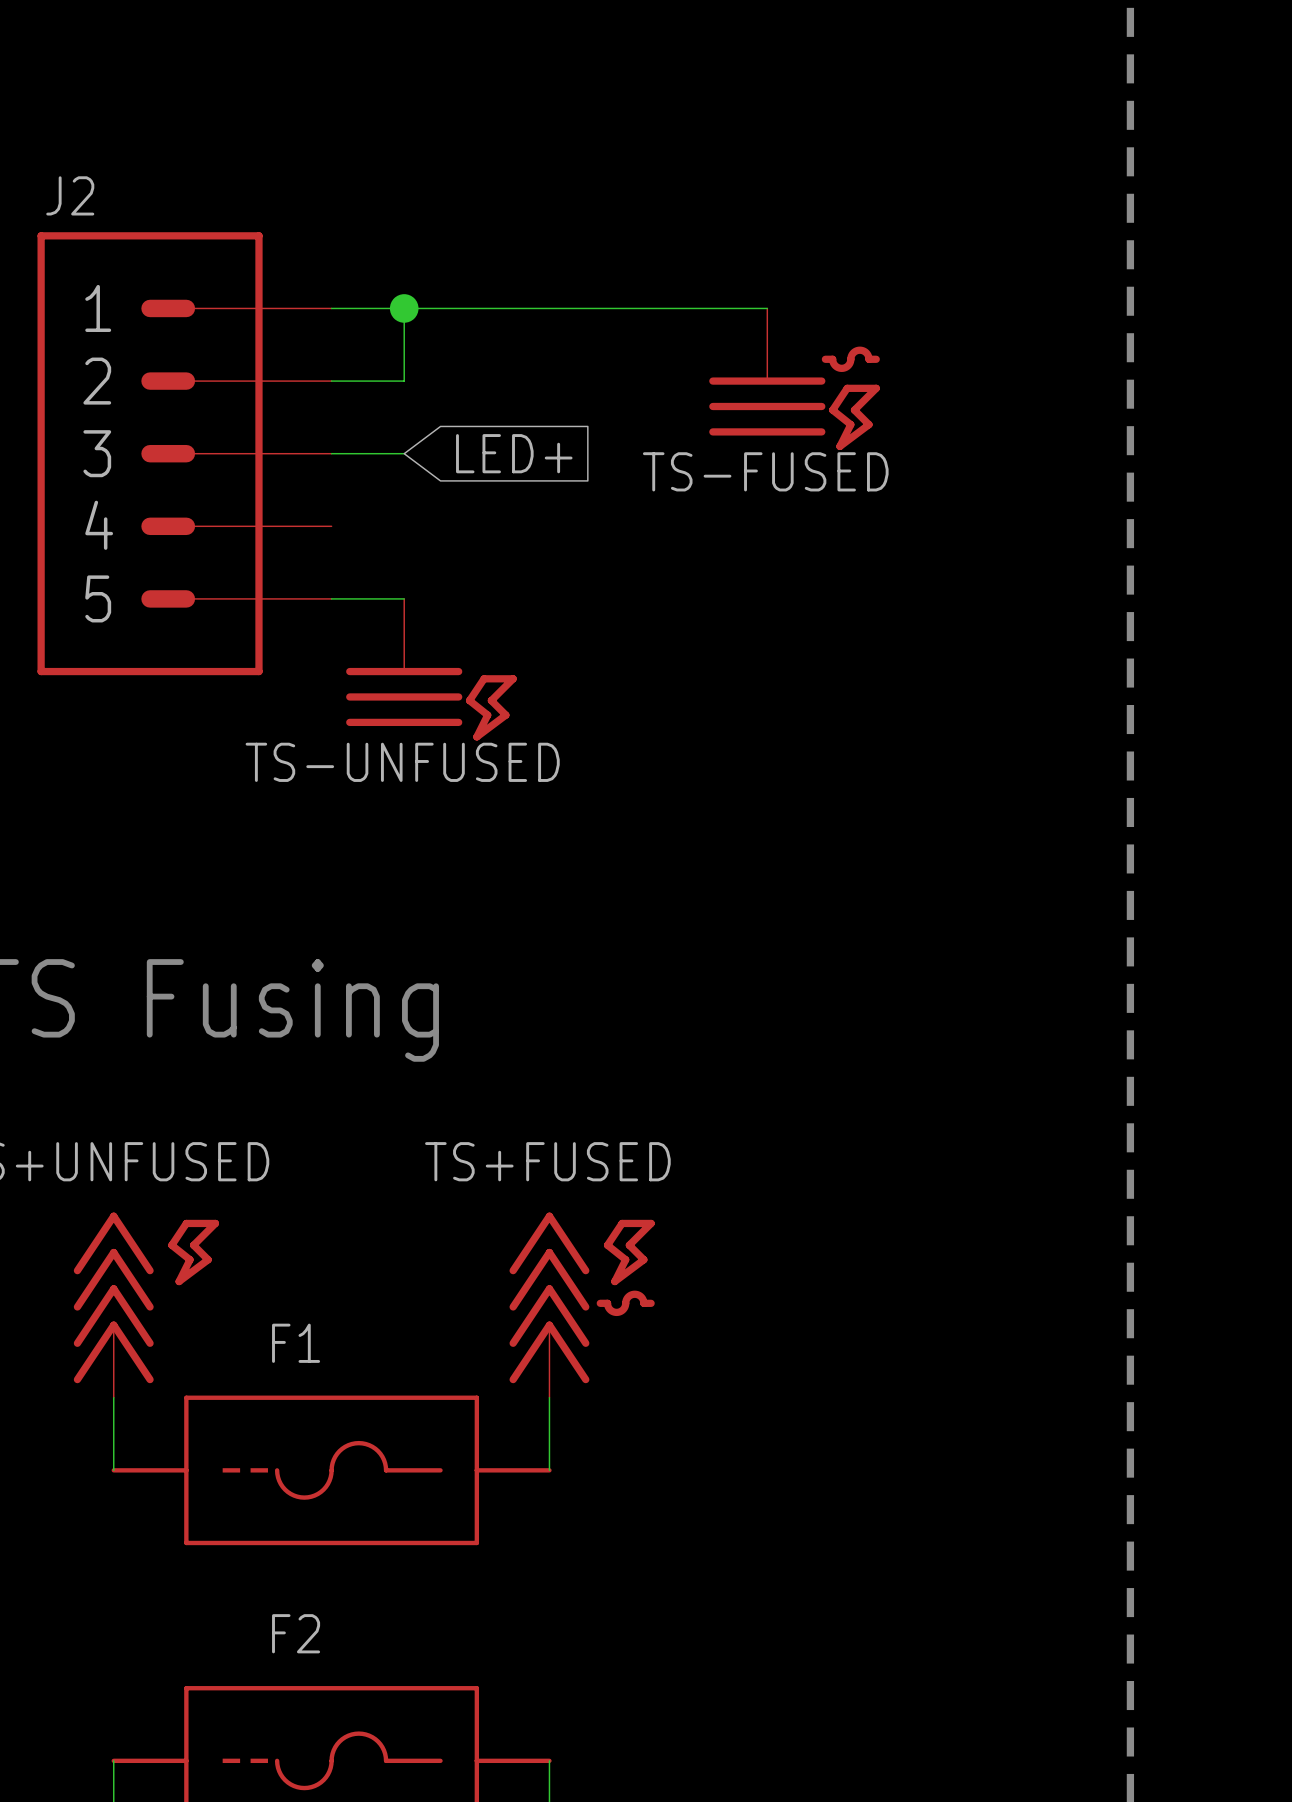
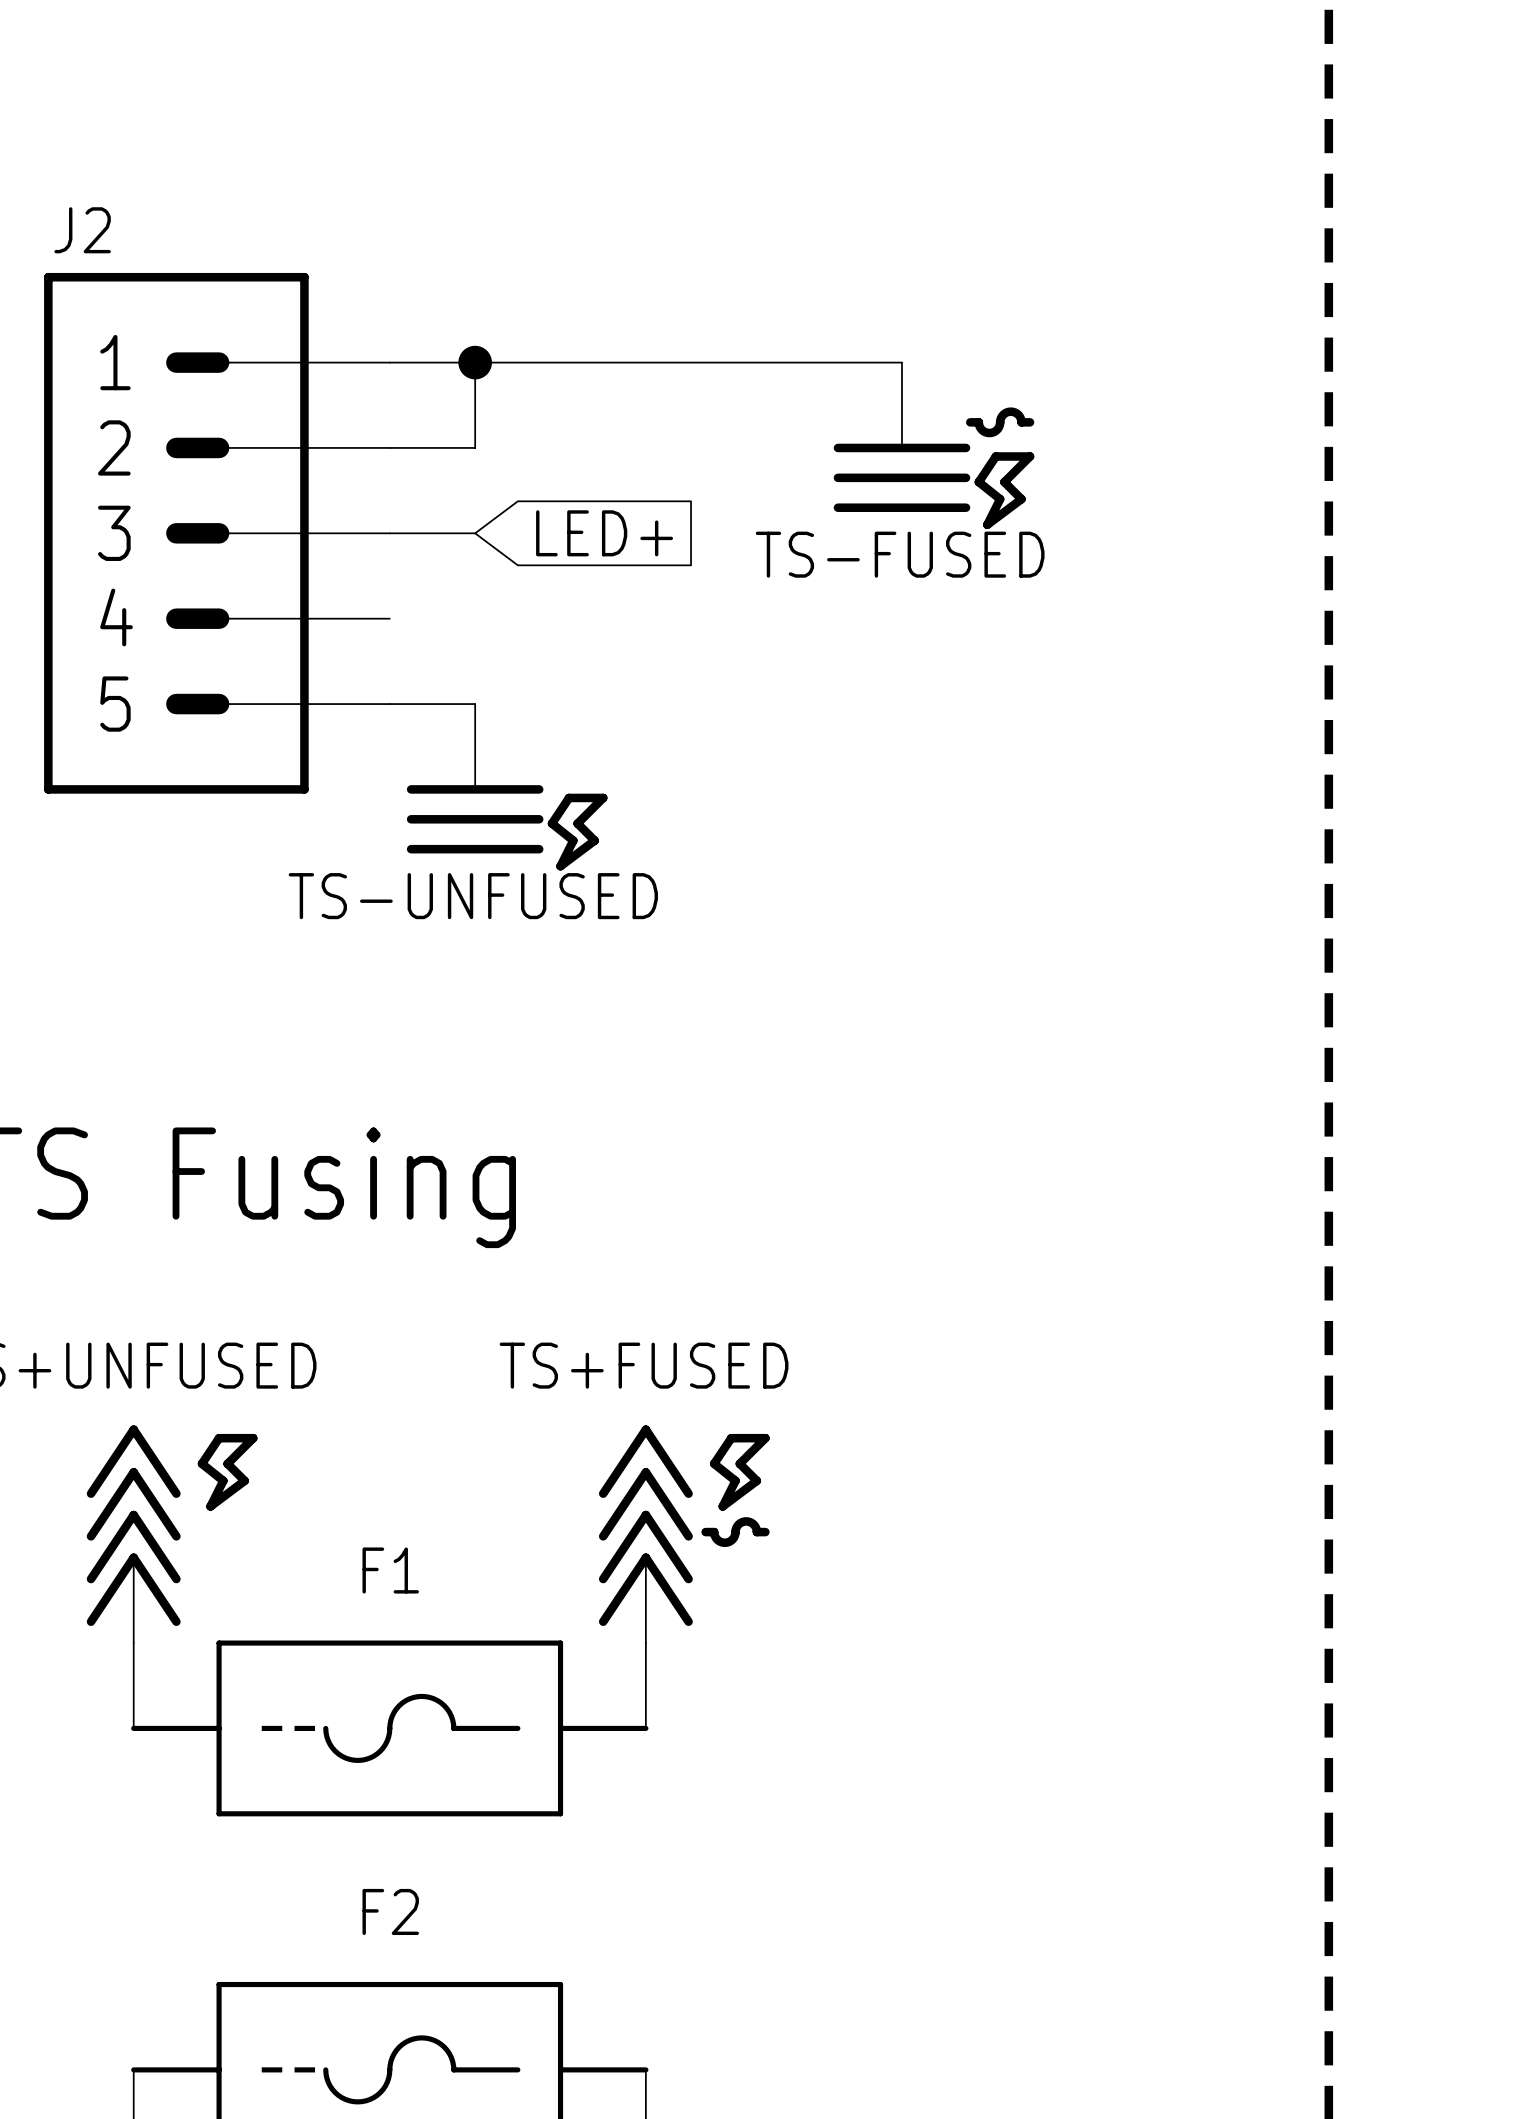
F1 name position: F1 (296, 1343) -> F1 (390, 1570)
F2 name position: F2 (296, 1633) -> F2 (390, 1911)

